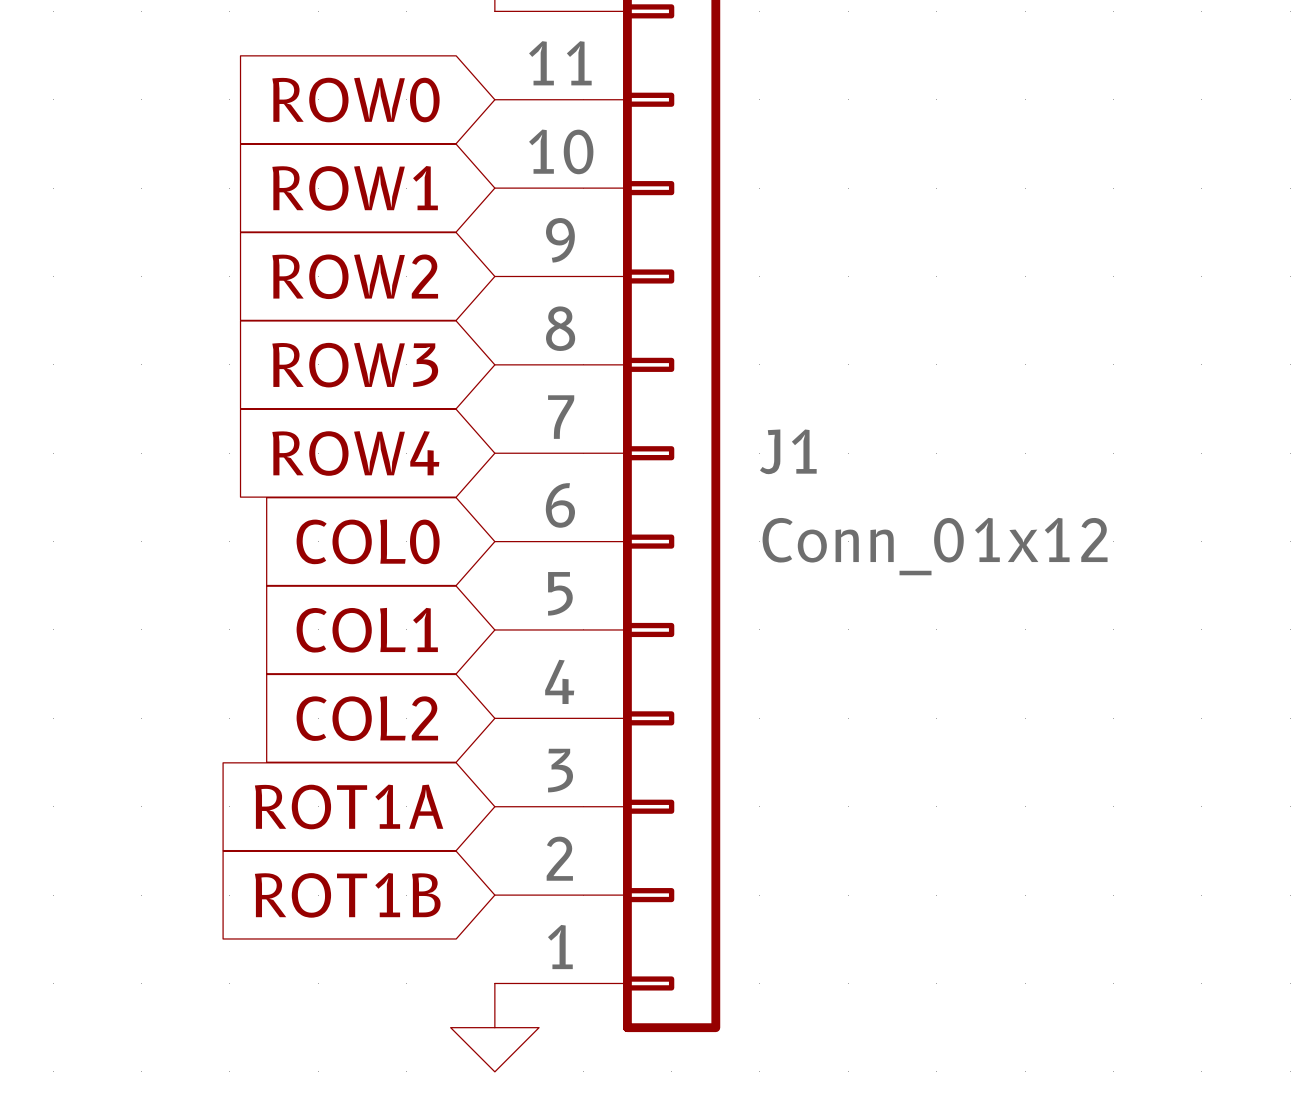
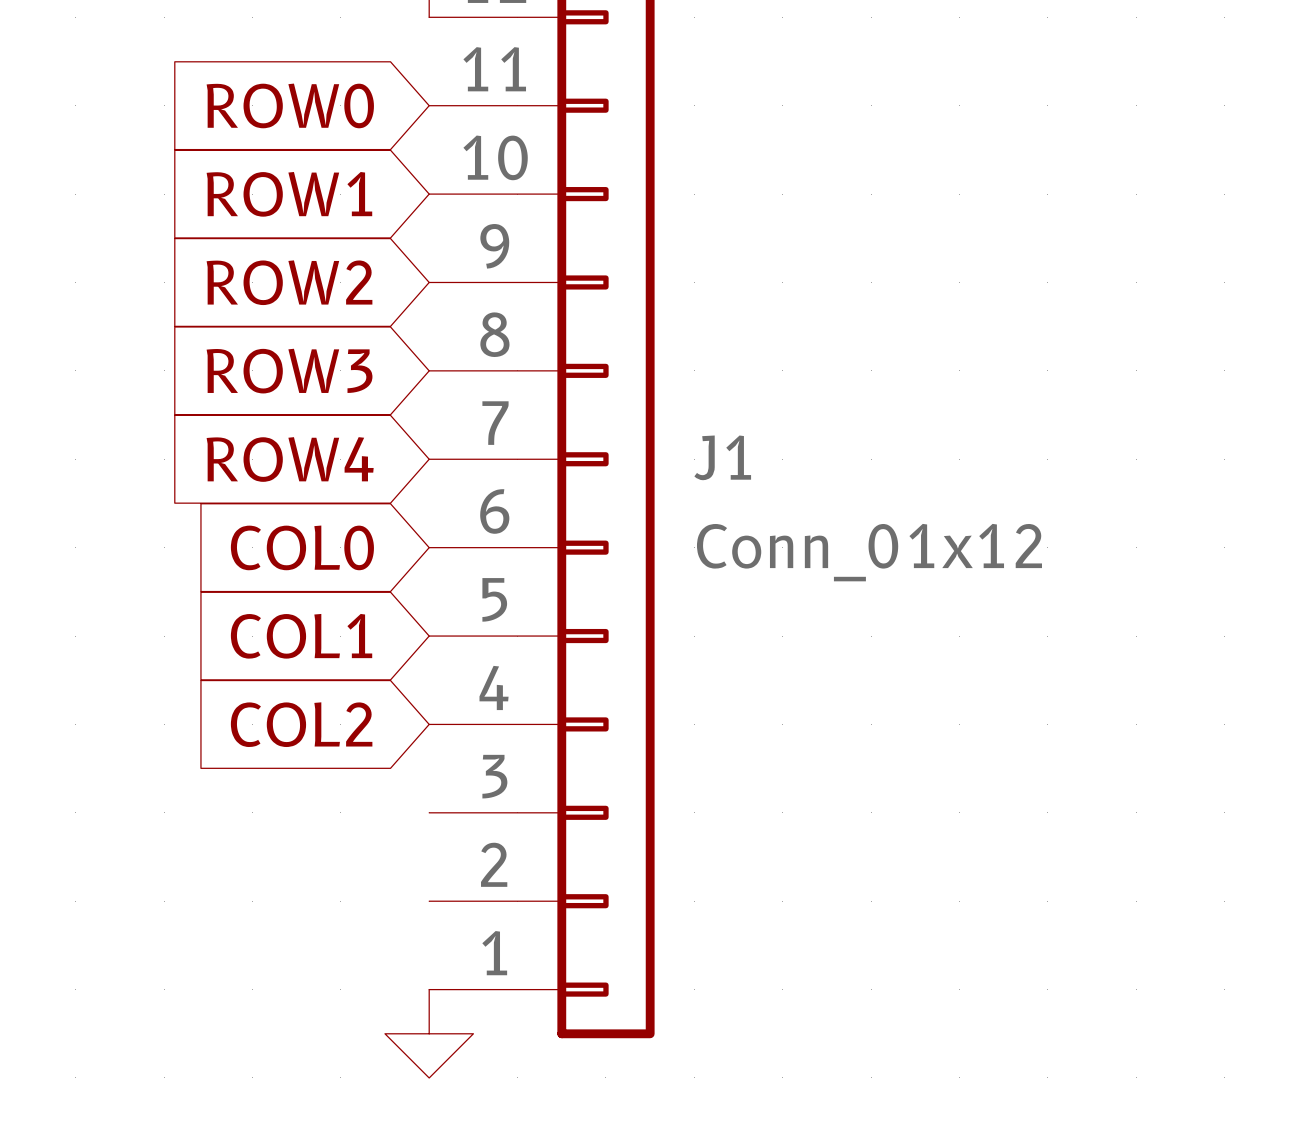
global label: ROT1A (349, 806) -> none
global label: ROT1B (347, 895) -> none

